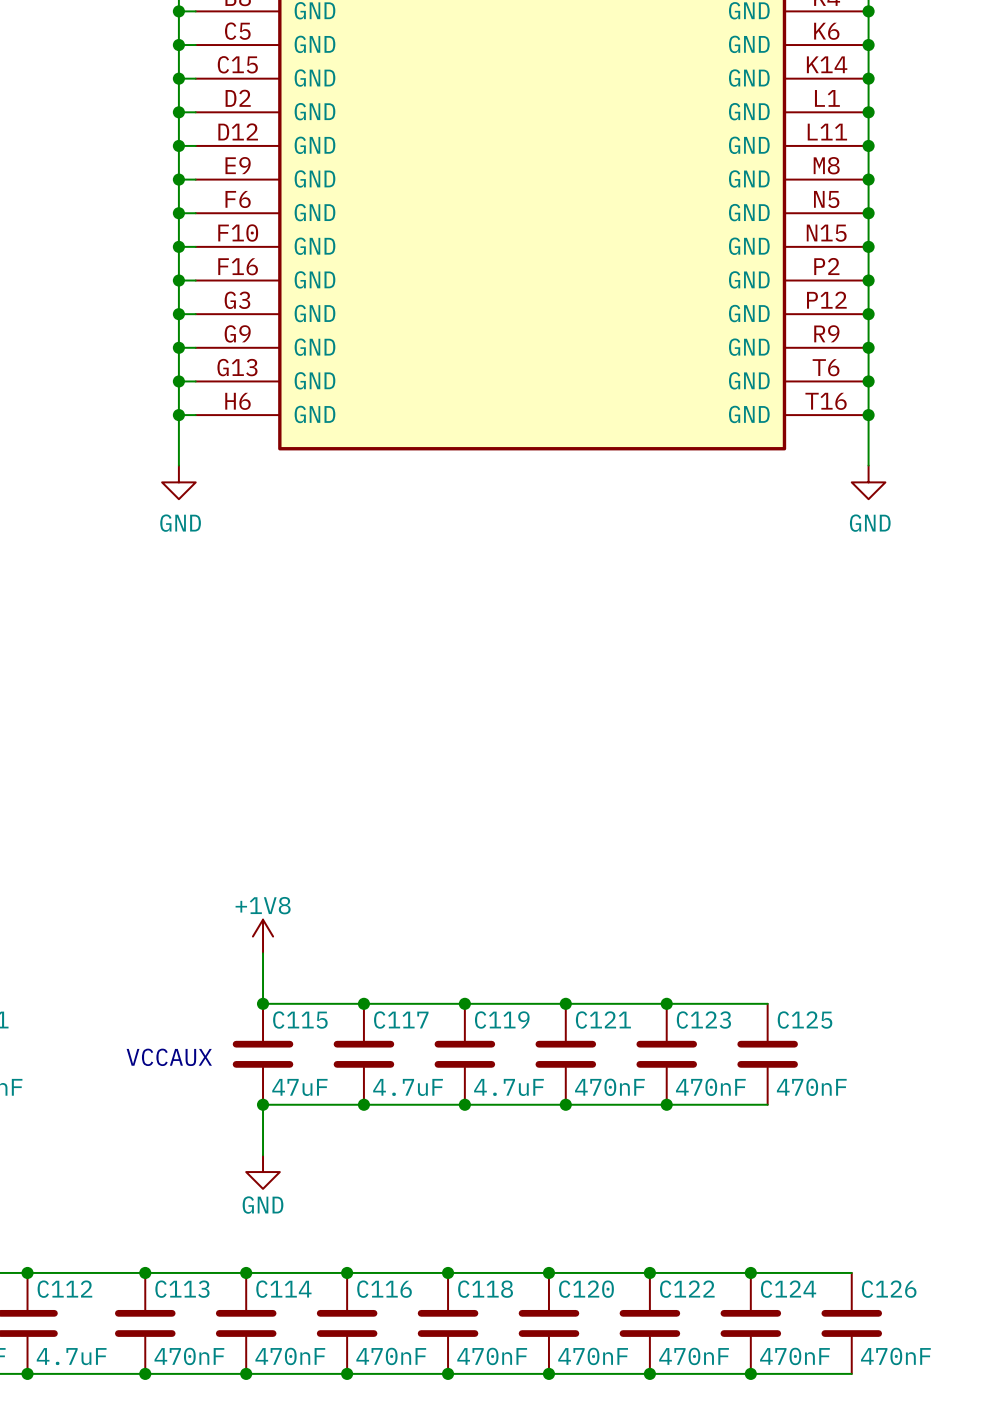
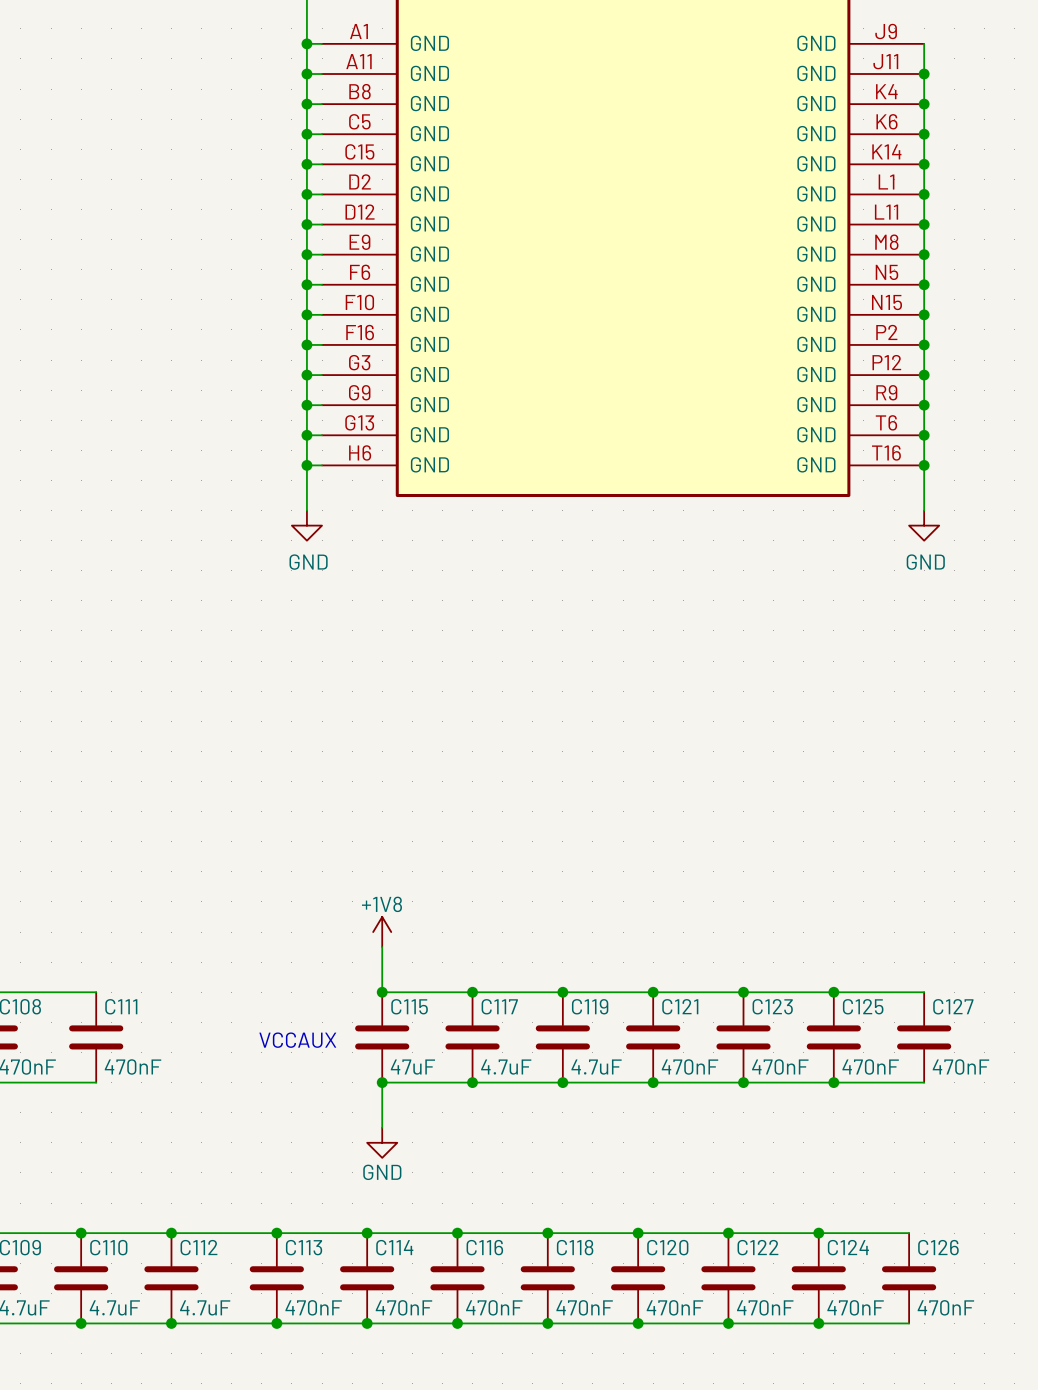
wire: none -> (833, 992) (924, 992)
junction: none -> (833, 992)
C127: none -> 470nF (924, 1037)
wire: none -> (833, 1082) (924, 1082)
junction: none -> (833, 1082)

